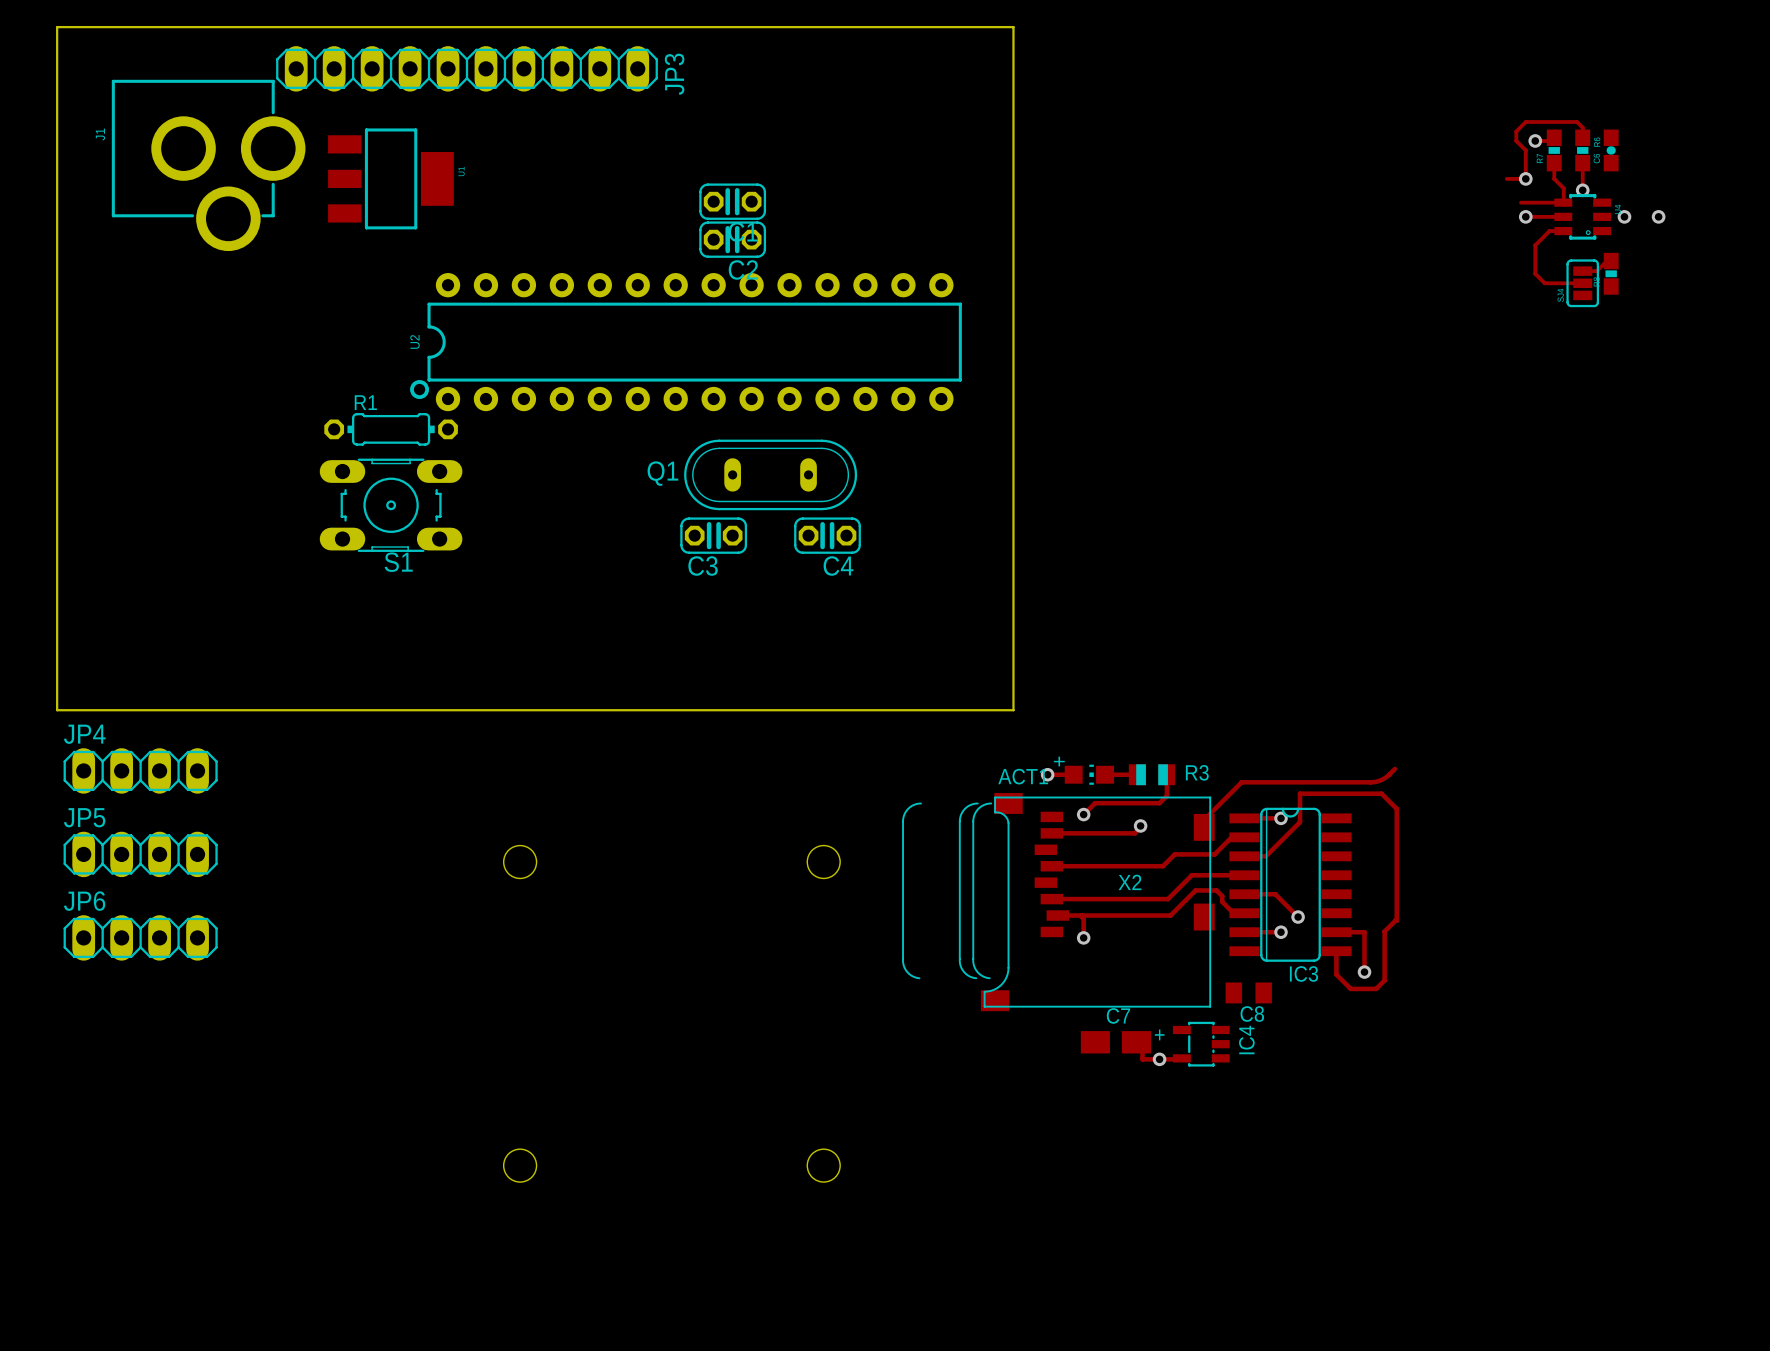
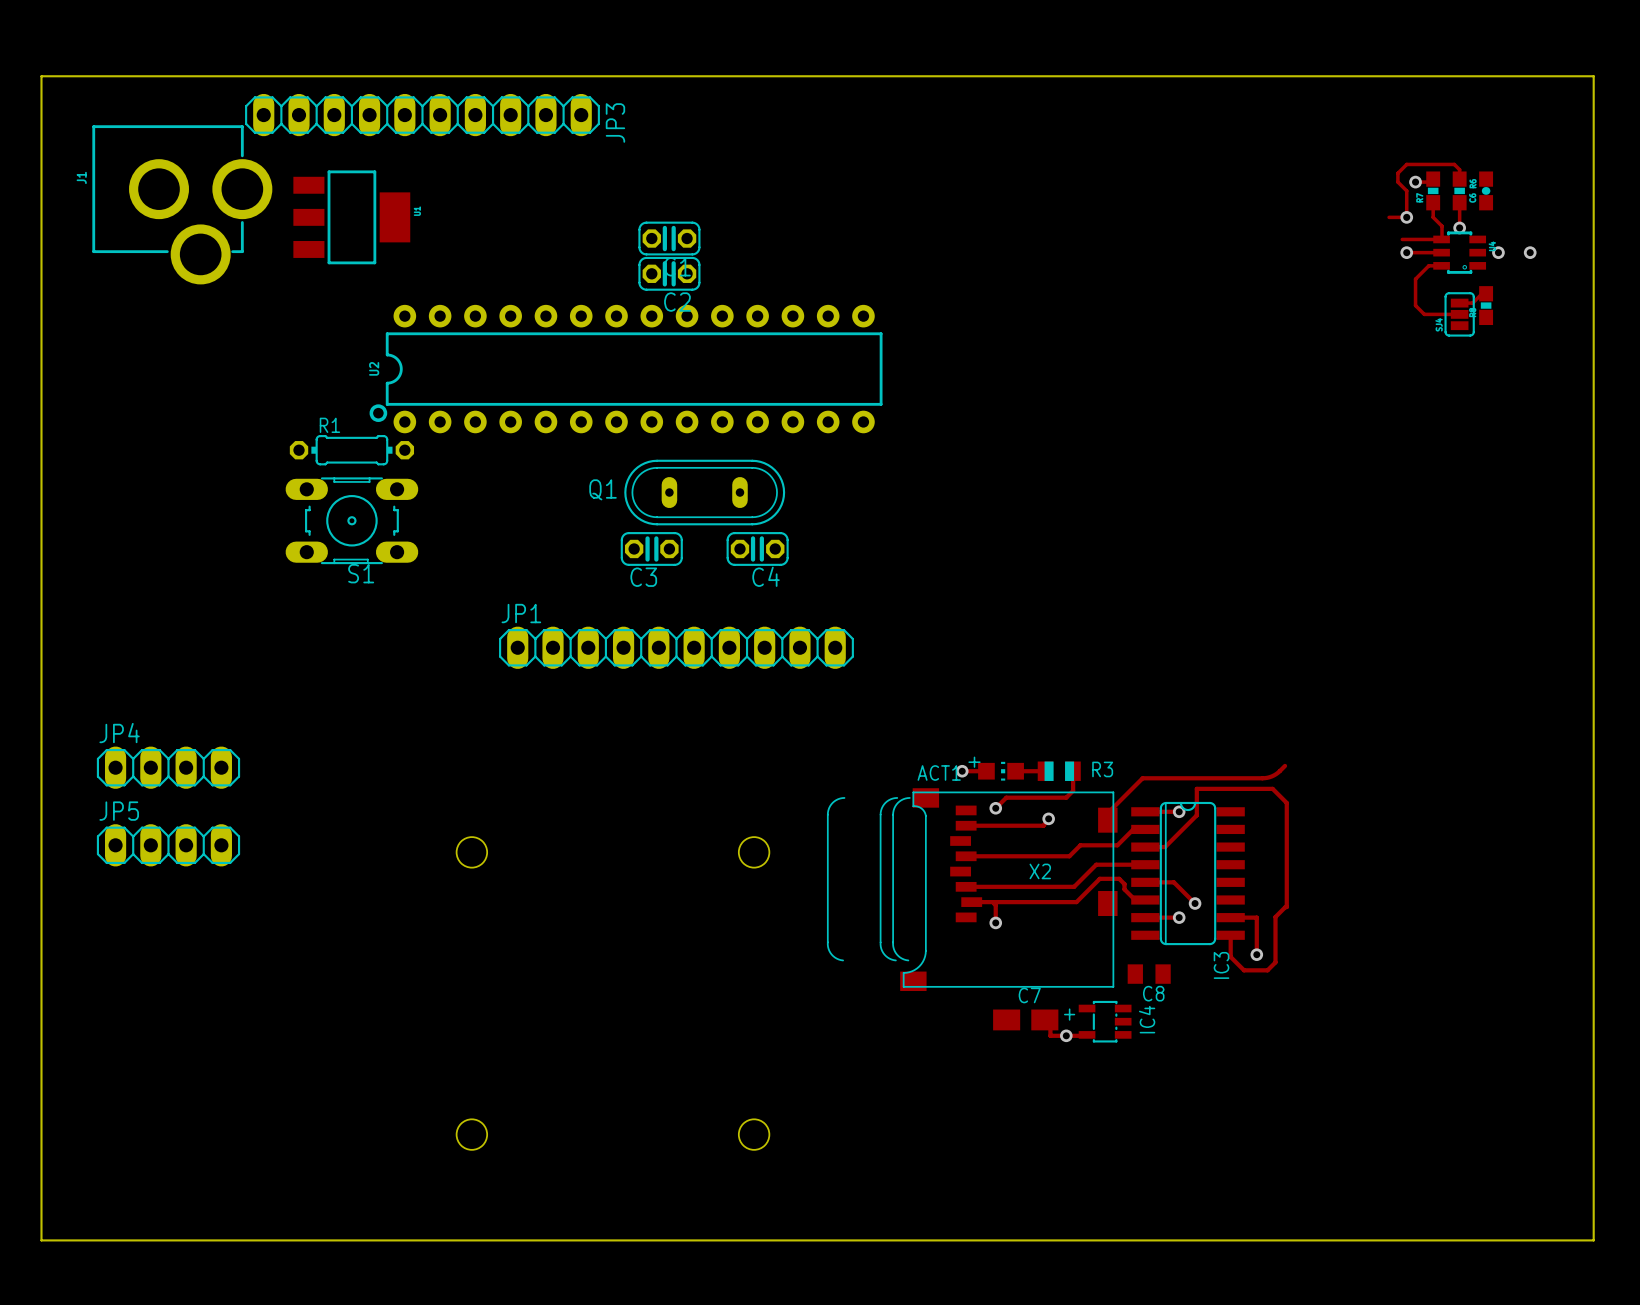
board edge: (1013, 27) (1013, 710) (57, 710) -> (930, 76) (1593, 76) (1593, 1240) (41, 1240) (41, 711)
JP1: none -> (676, 647)
JP4 position: (140, 770) -> (168, 767)
JP5 position: (140, 854) -> (168, 845)
JP6: (140, 937) -> none
IC3 name rotation: 0° (1303, 973) -> 90° counterclockwise (1221, 965)

